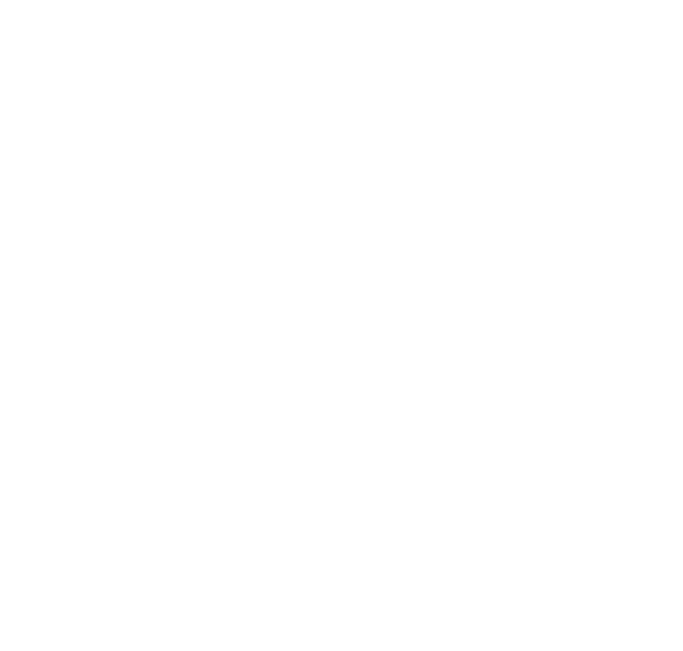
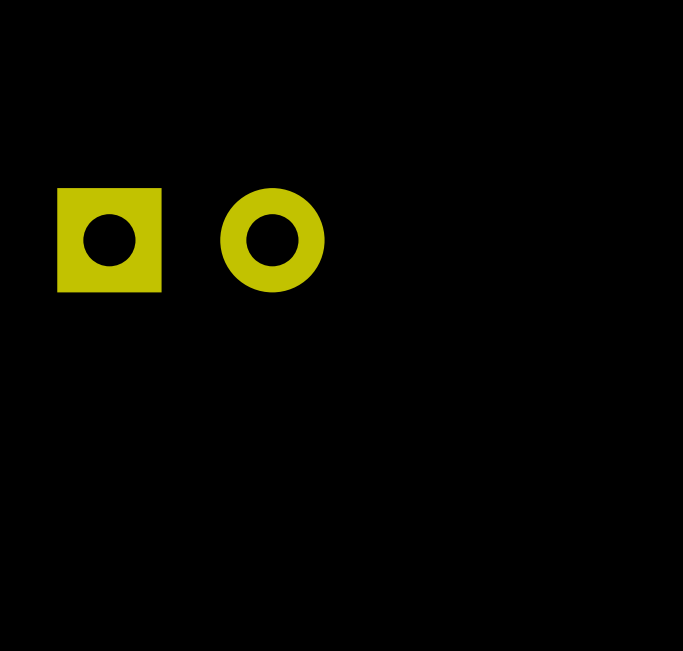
part: none -> (190, 240)

